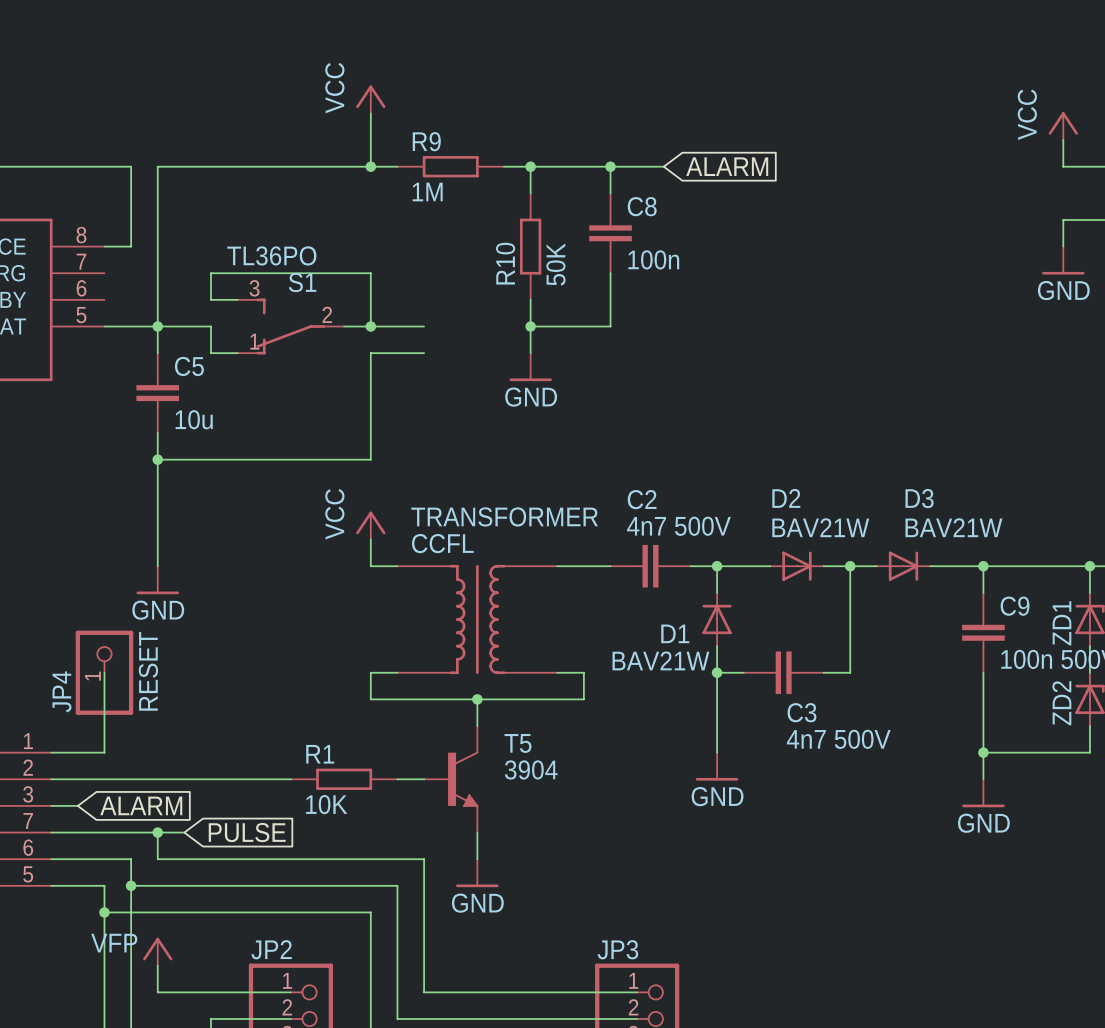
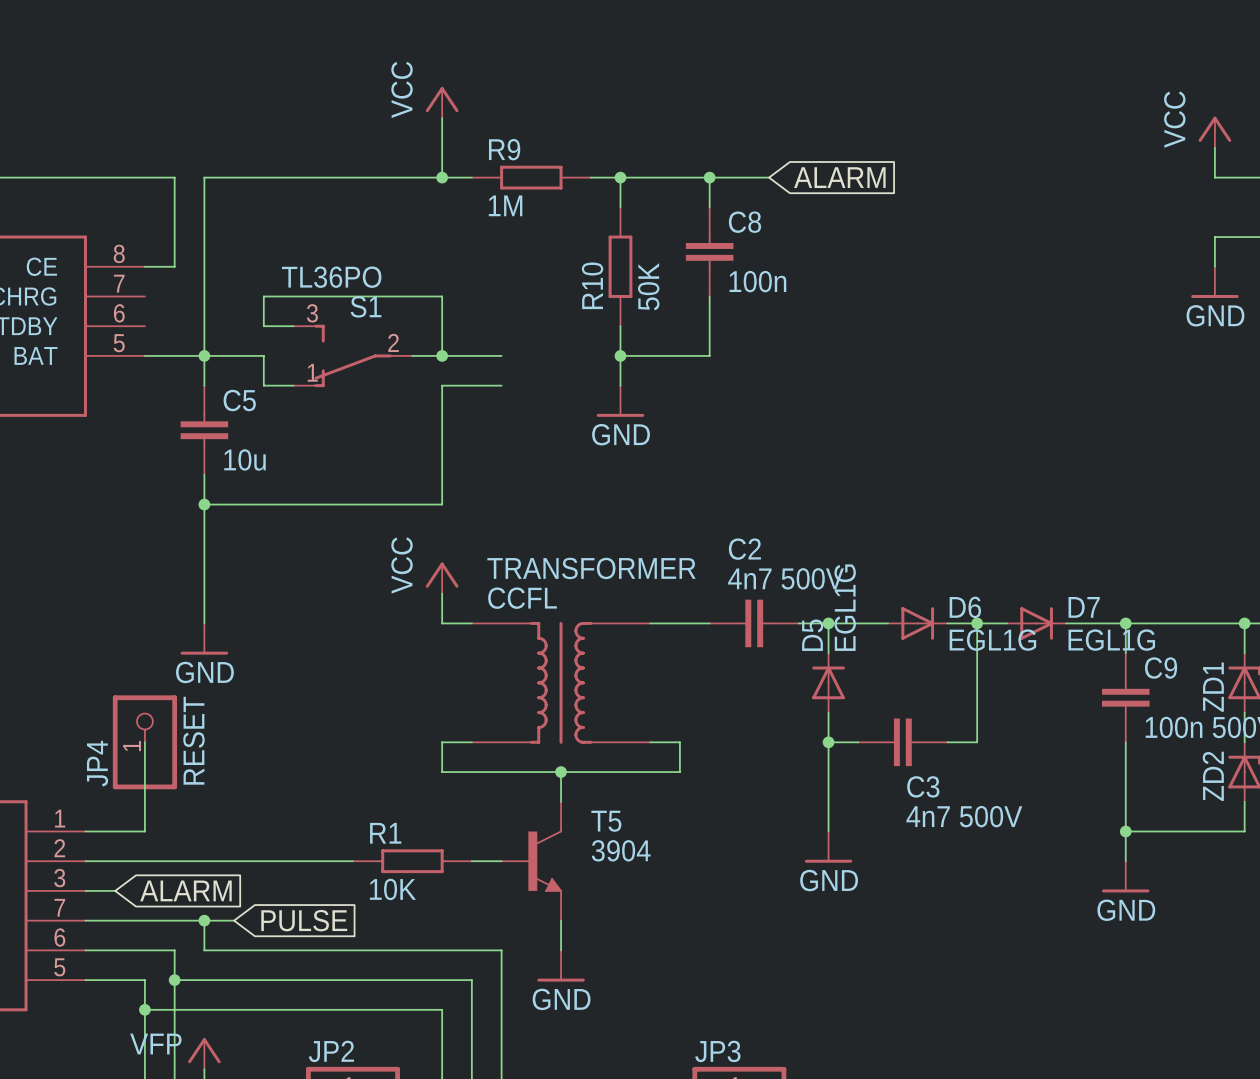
D2 name: D2 (786, 498) -> D6 (965, 607)
D3 name: D3 (919, 498) -> D7 (1084, 607)
D2 value: BAV21W (820, 527) -> EGL1G (992, 640)
D3 value: BAV21W (953, 527) -> EGL1G (1111, 640)
D1 name: D1 (675, 633) -> D5 (812, 635)
D1 value: BAV21W (660, 660) -> EGL1G (845, 607)

